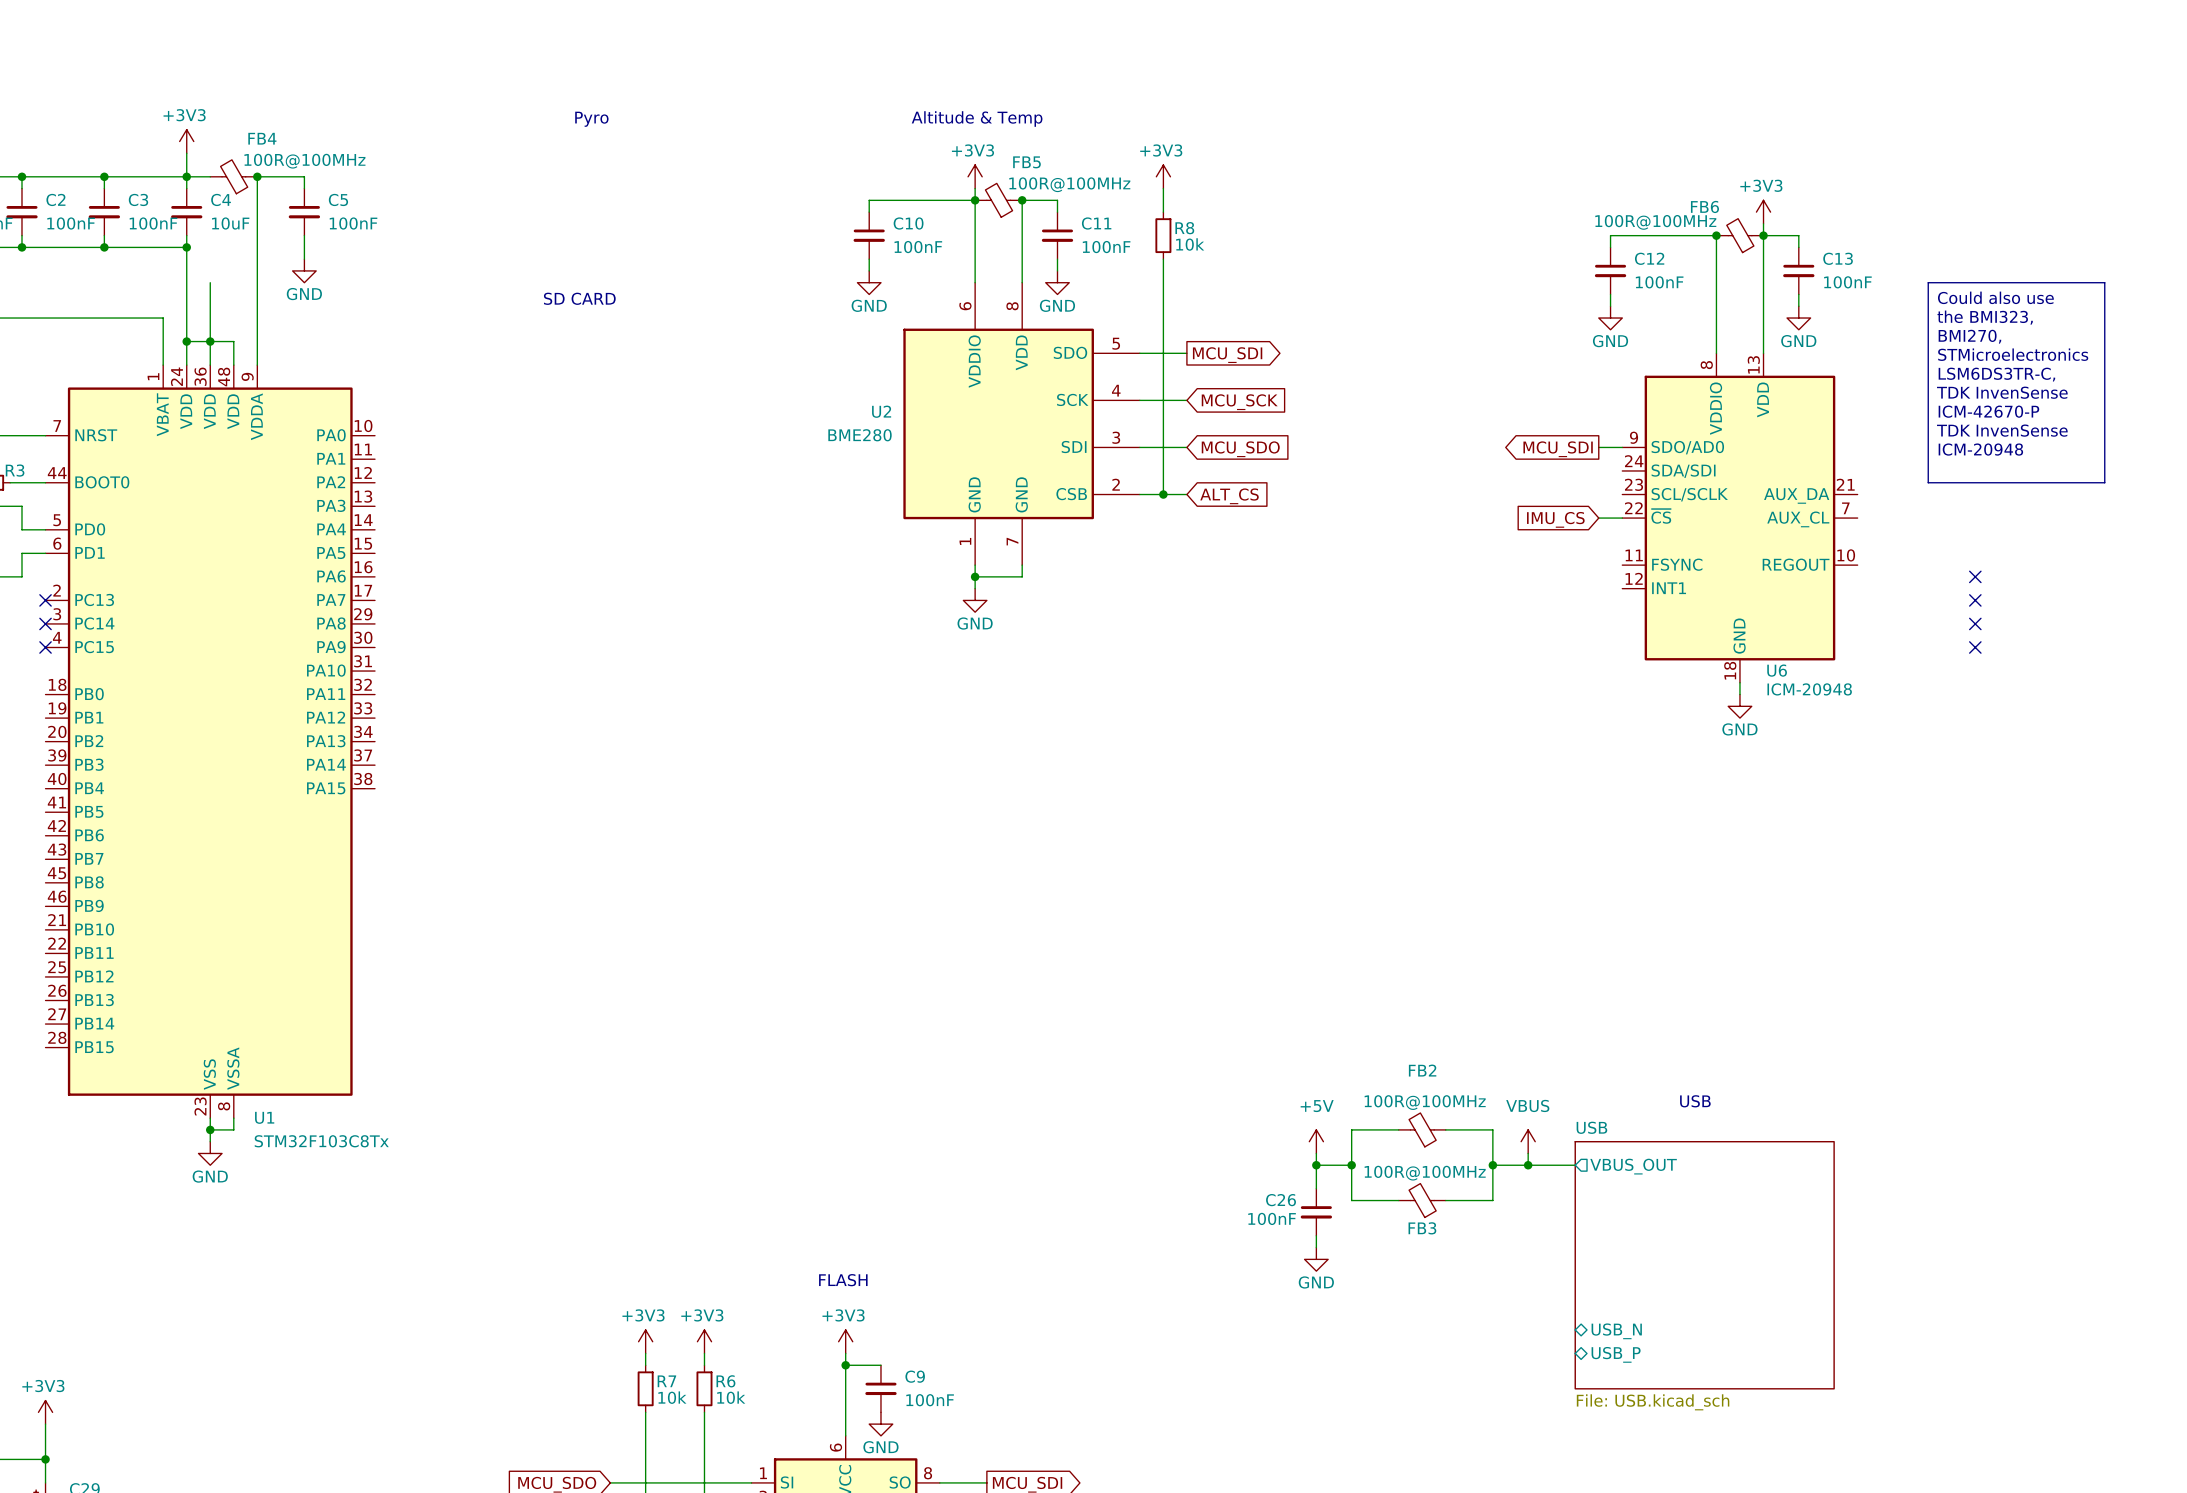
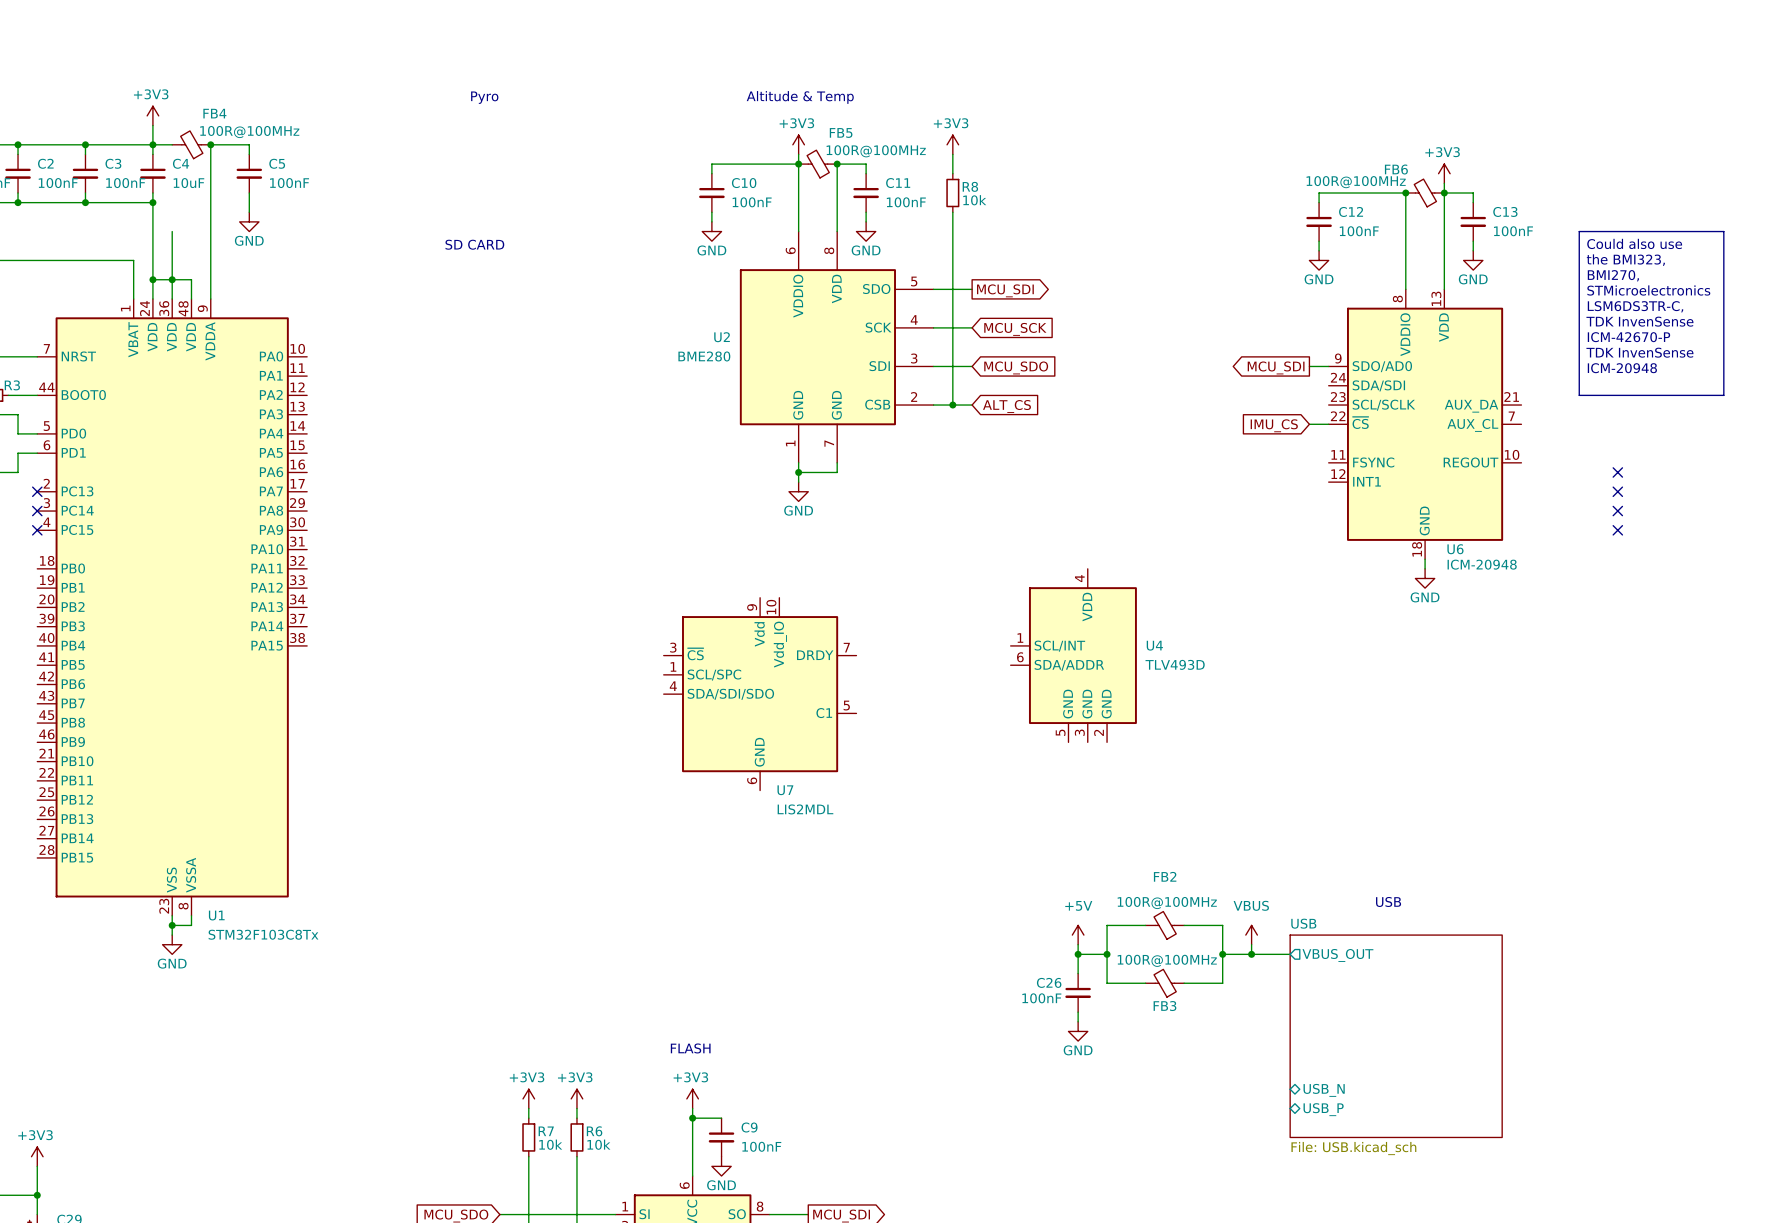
U4: none -> TLV493D (1073, 655)
U7: none -> LIS2MDL (760, 694)

